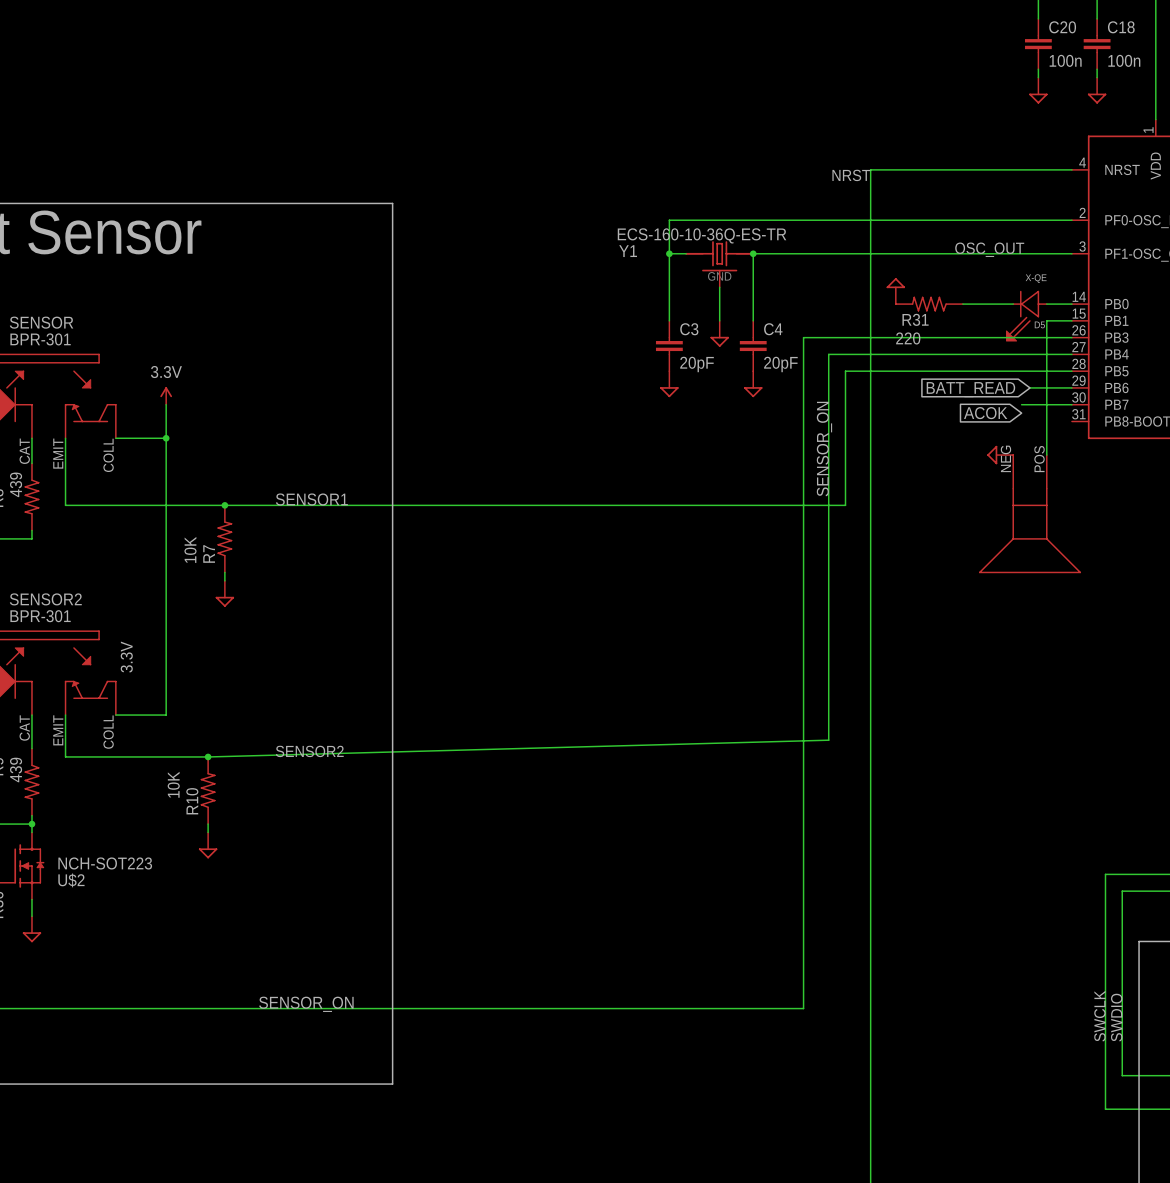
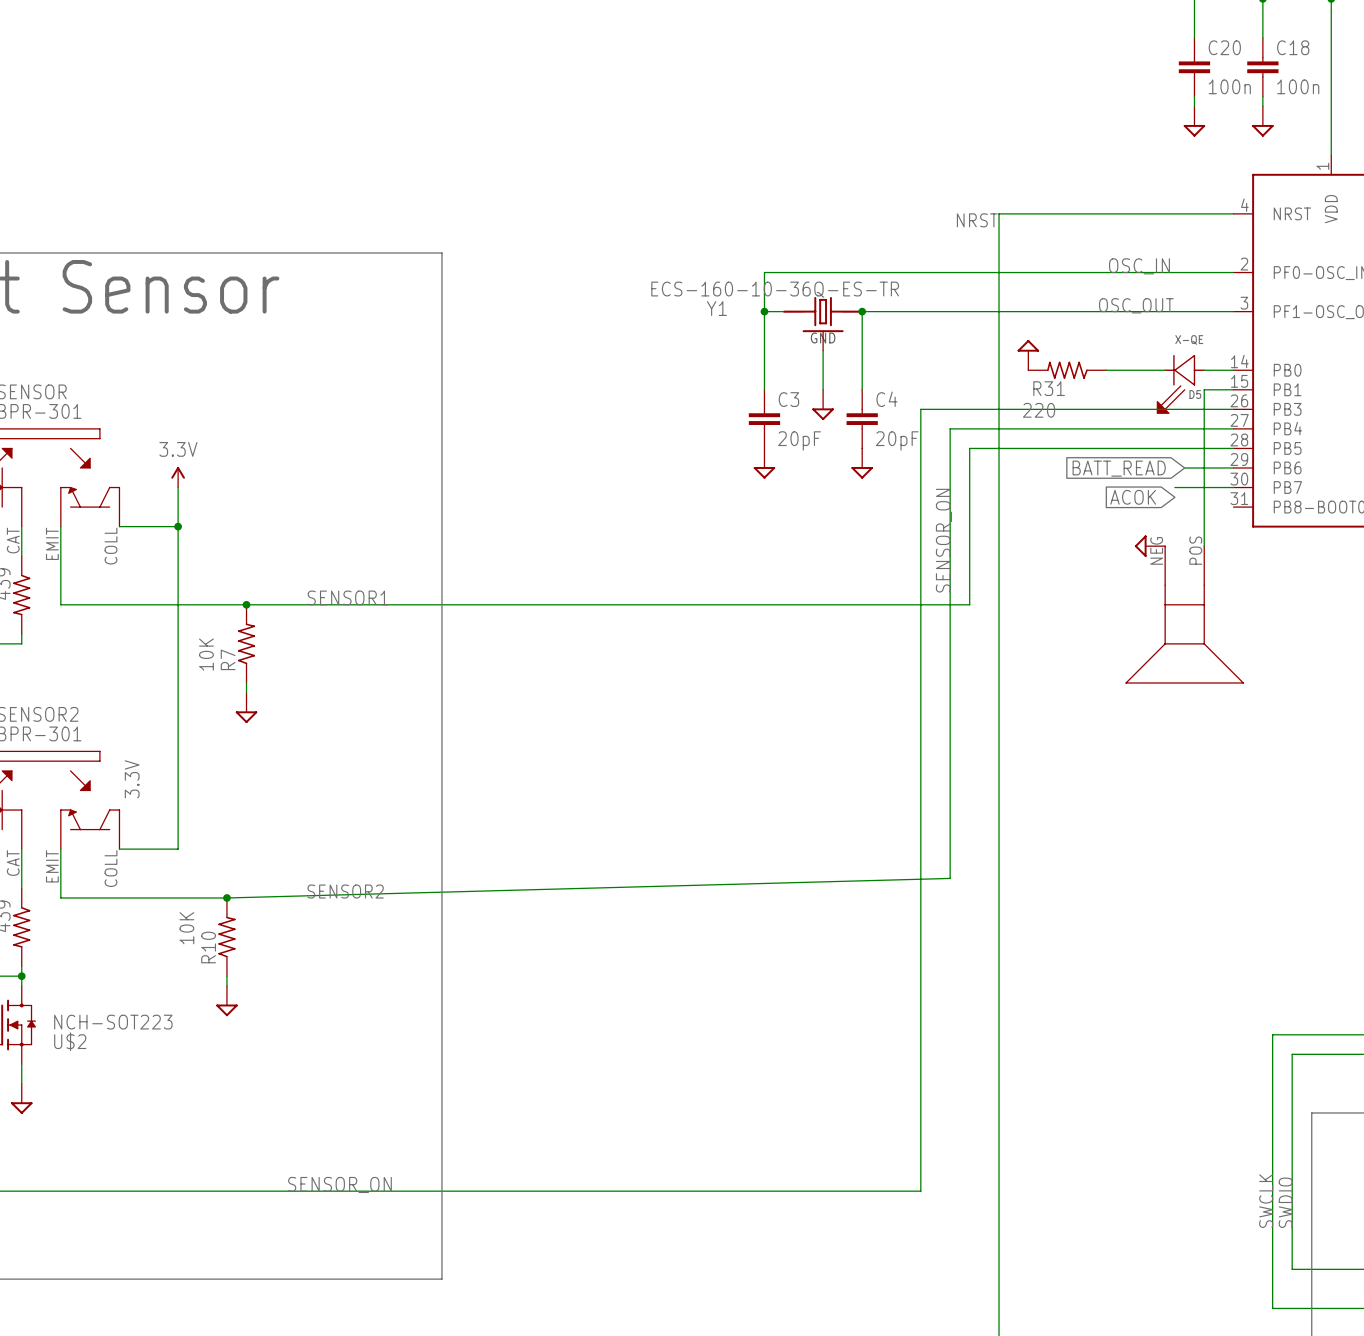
label: none -> OSC_IN (1139, 266)

